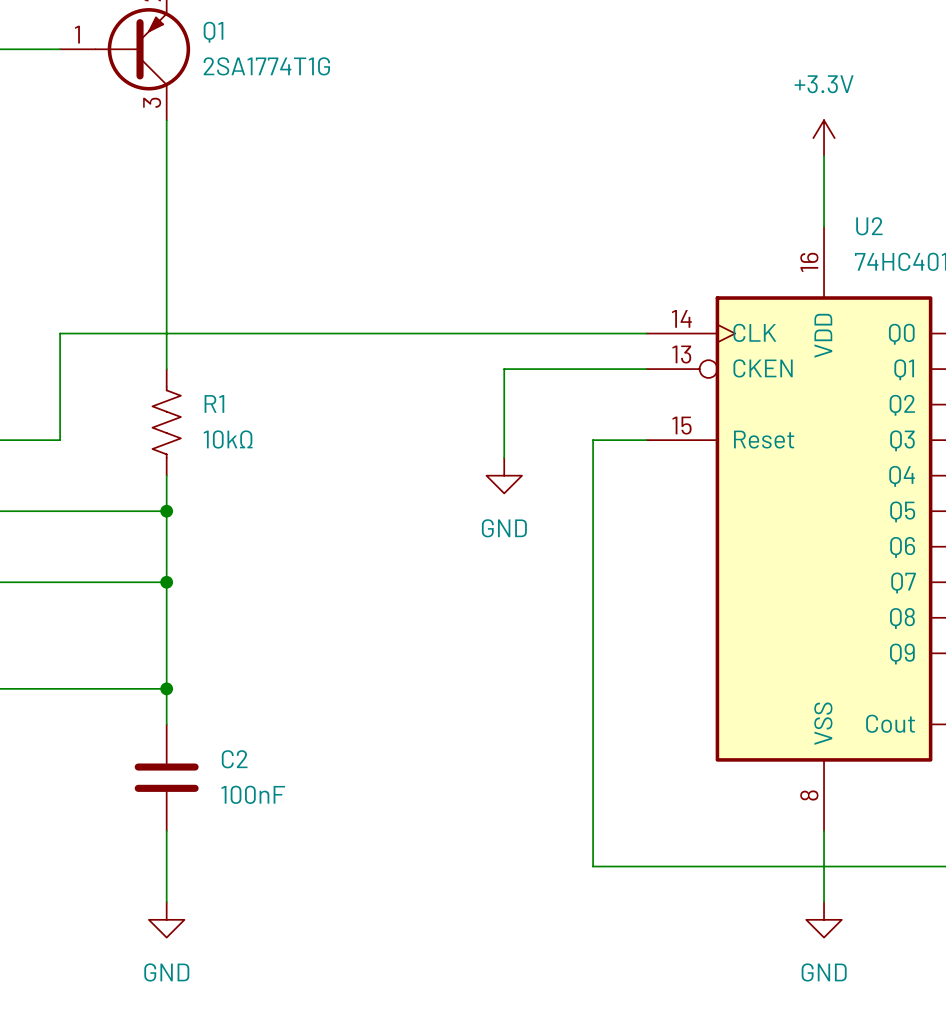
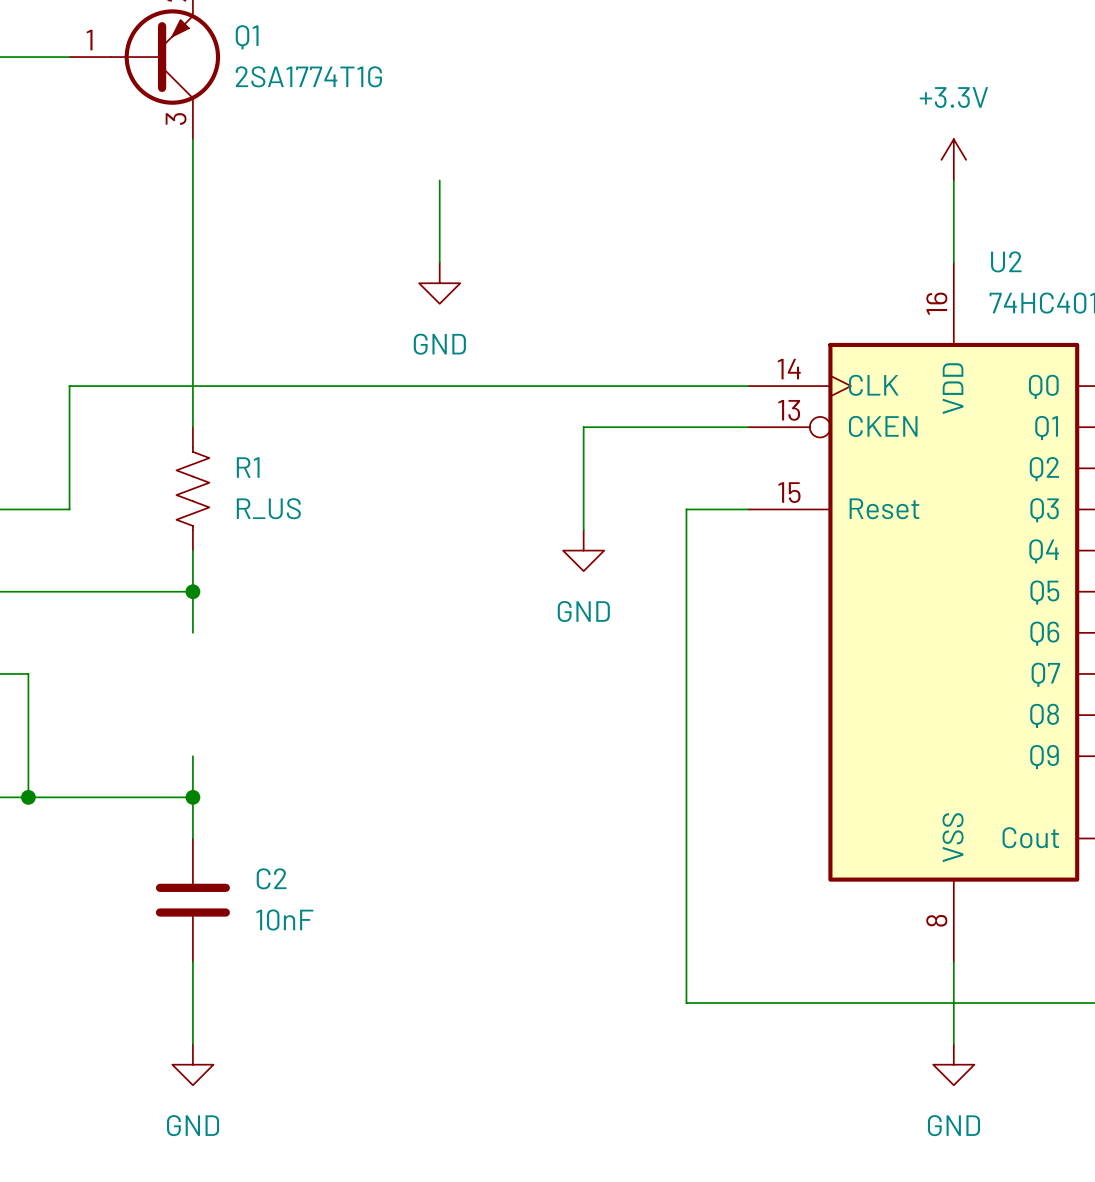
wire: none -> (439, 180) (439, 262)
power symbol: none -> GND (439, 283)
R1 value: 10kΩ (228, 439) -> R_US (268, 508)
wire: (166, 546) (166, 653) -> none
wire: (24, 582) (166, 582) -> (28, 673) (28, 797)
junction: (166, 582) -> none
junction: none -> (28, 797)
C2 value: 100nF (253, 794) -> 10nF (284, 919)

